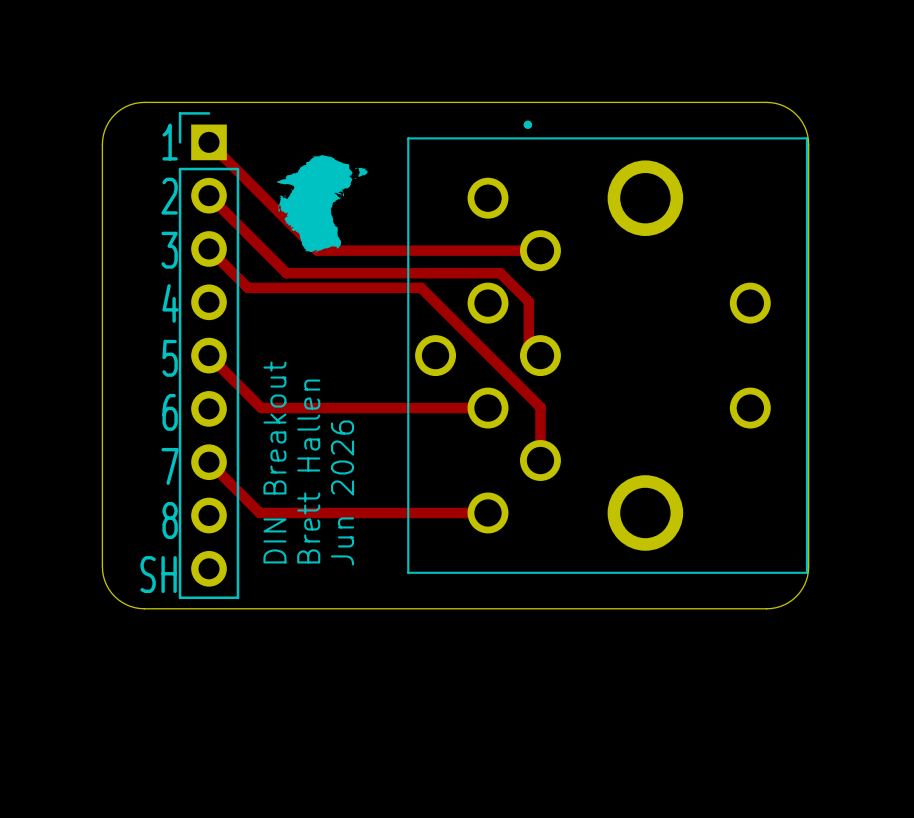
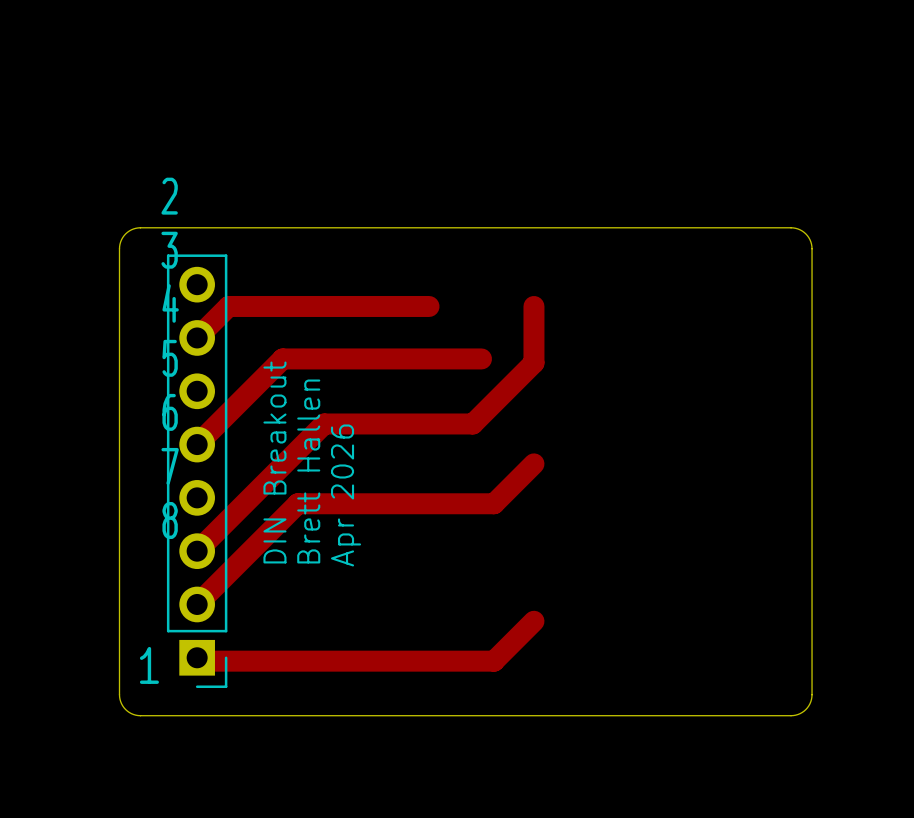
board edge: (144, 102) (766, 102) (780, 104) (792, 111) (804, 126) (808, 144) (808, 566) (806, 580) (799, 592) (784, 604) (766, 608) (144, 608) (130, 606) (118, 599) (106, 585) (102, 566) (102, 144) (104, 130) (114, 114) (130, 104) (144, 102) -> (140, 227) (131, 229) (125, 233) (121, 239) (119, 248) (119, 694) (121, 703) (127, 711) (140, 715) (791, 715) (800, 713) (807, 707) (812, 694) (812, 248) (809, 239) (804, 232) (791, 227) (140, 227)
text: 1 (170, 142) -> none
track: (209, 142) (317, 250) (540, 250) -> none
drawing: [275, 155, 368, 254] -> none
track: (209, 195) (286, 273) (500, 273) (528, 301) (528, 343) (540, 355) -> none
track: (209, 248) (247, 287) (421, 287) (540, 407) (540, 460) -> none
track: none -> (429, 306) (228, 306) (197, 337)
track: none -> (533, 306) (533, 362) (472, 423) (324, 423) (197, 551)
part: (607, 347) -> none
track: (209, 355) (261, 408) (488, 408) -> none
part: (209, 355) -> none
track: none -> (481, 358) (282, 358) (197, 444)
track: (209, 462) (259, 512) (488, 512) -> none
track: none -> (533, 463) (494, 503) (297, 503) (197, 604)
part: none -> (197, 471)
text: Jun 2026 (342, 492) -> Apr 2026 (346, 495)
text: SH (158, 574) -> none
track: none -> (533, 621) (494, 661) (200, 661) (197, 657)
text: none -> 1 (149, 665)

